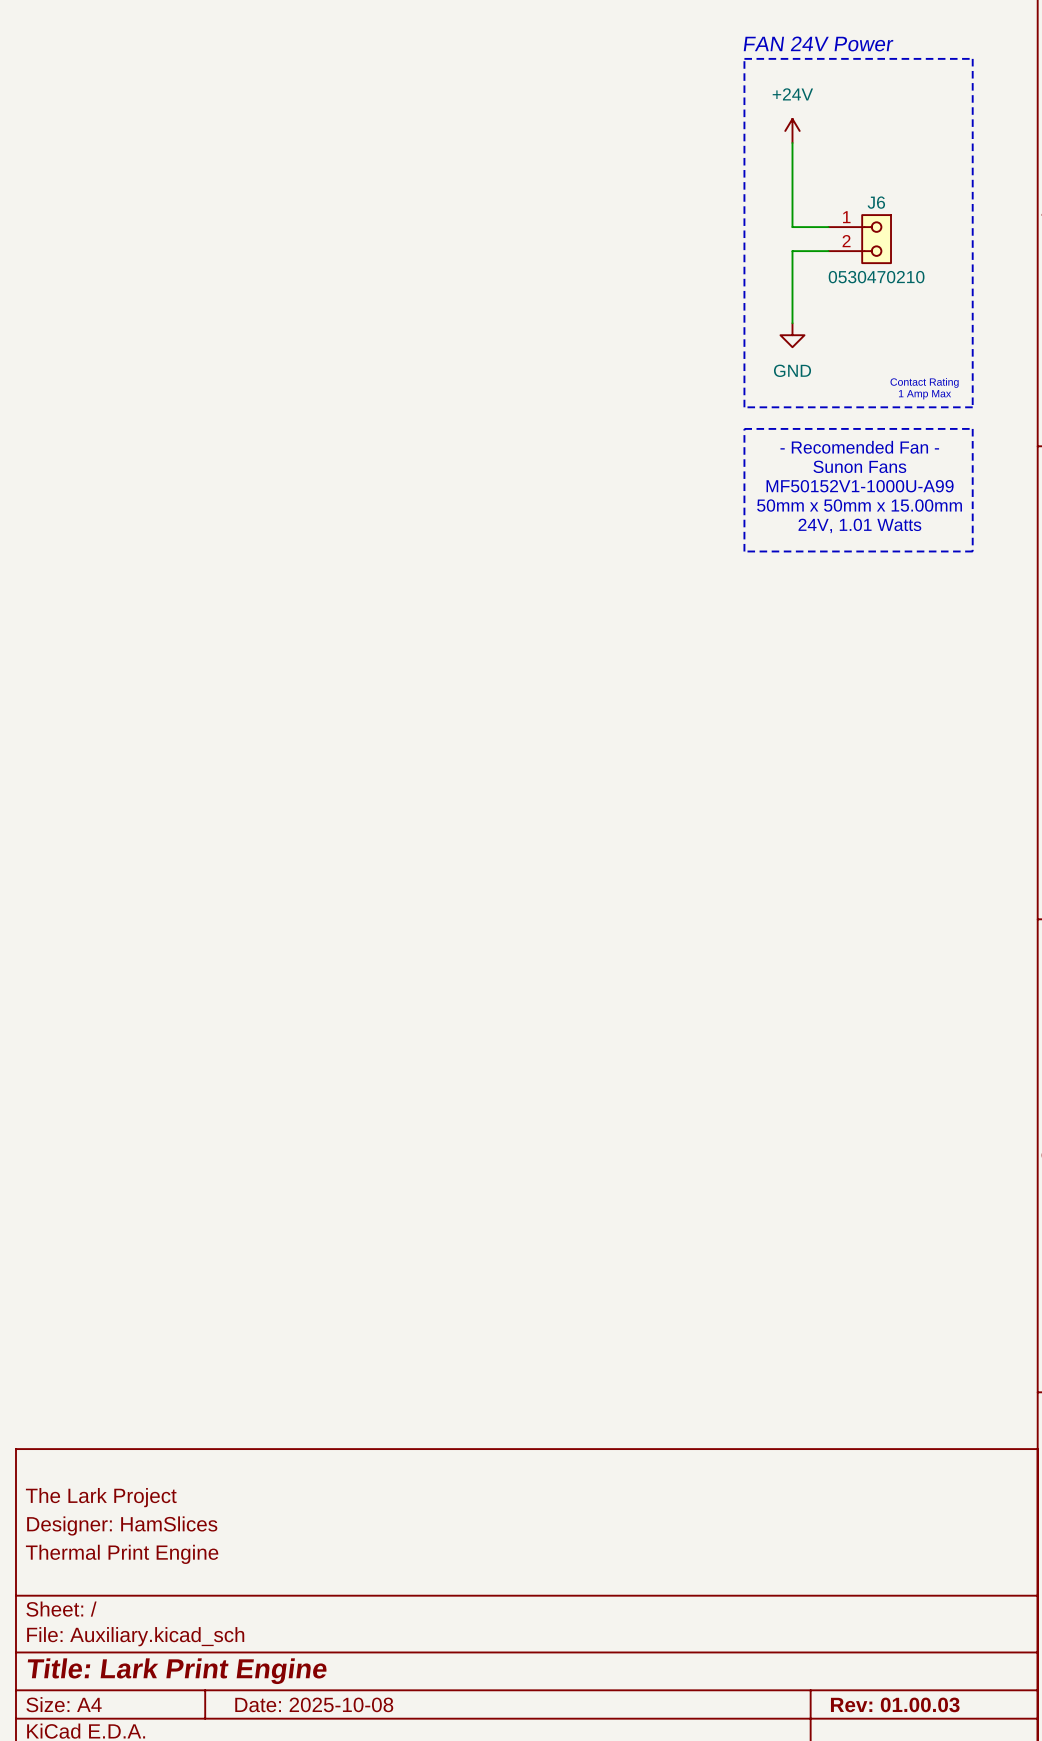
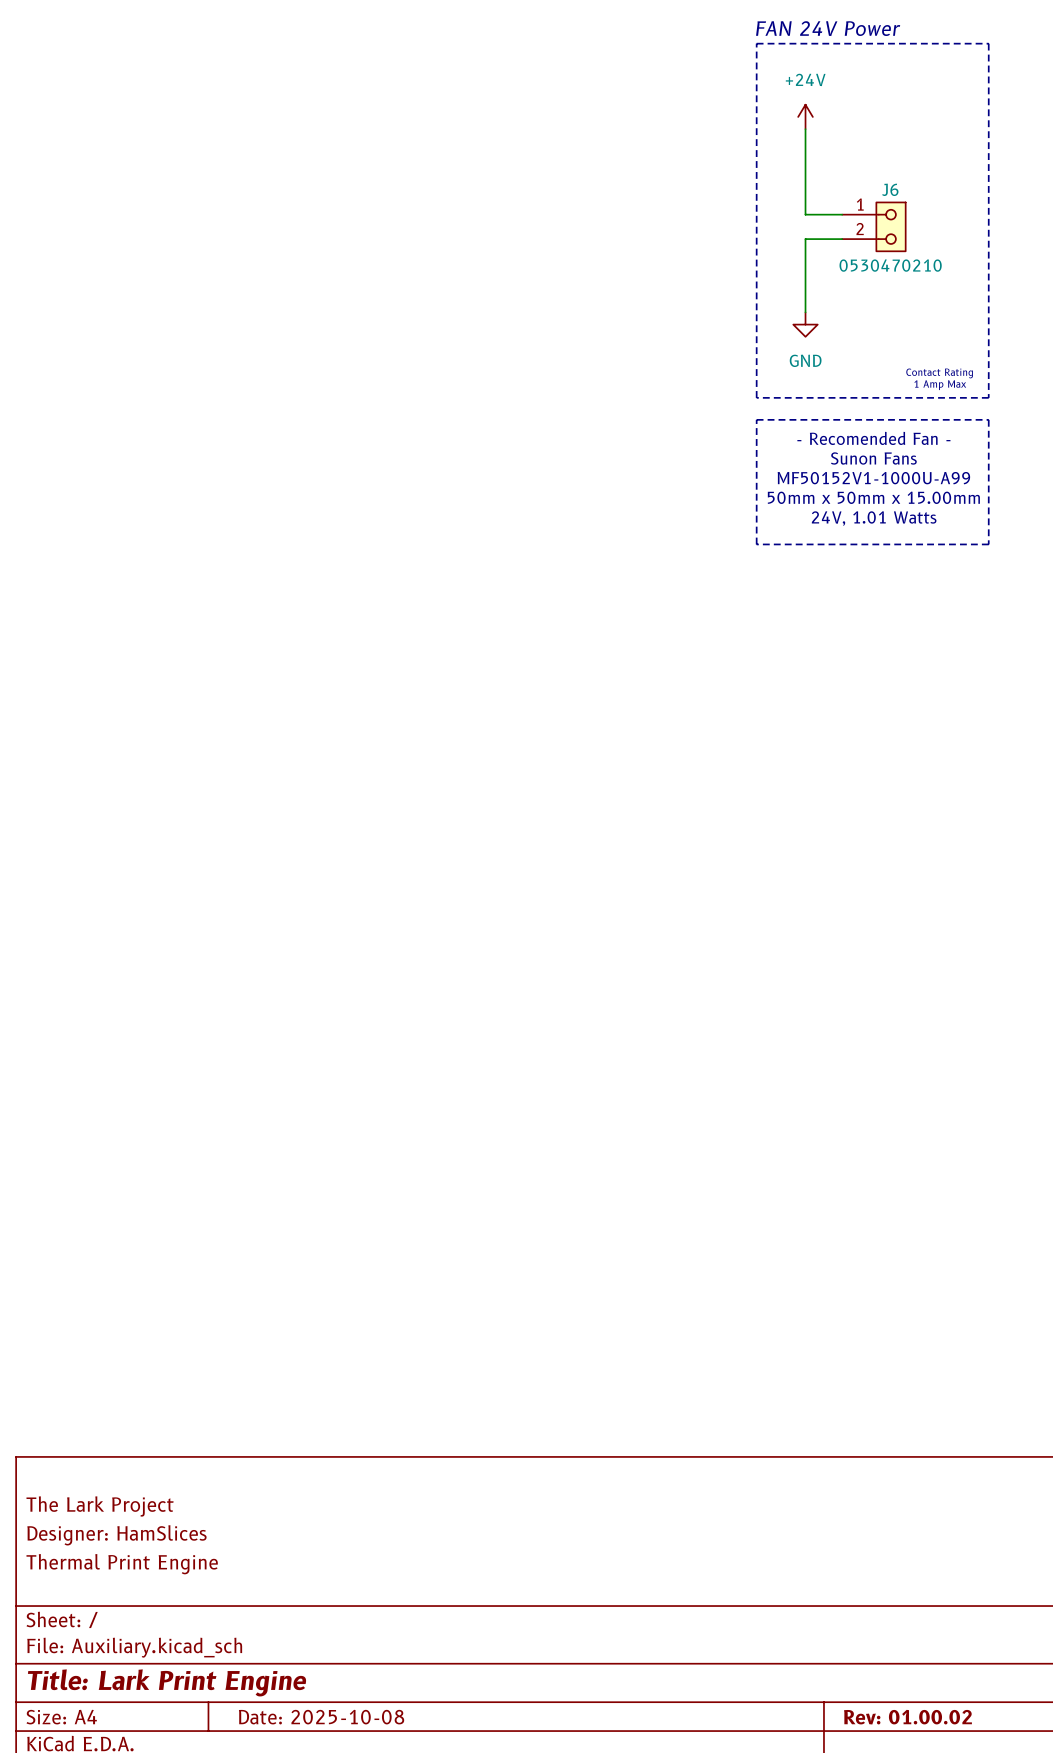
title block: Rev: 01.00.03 (895, 1704) -> Rev: 01.00.02 (907, 1717)

